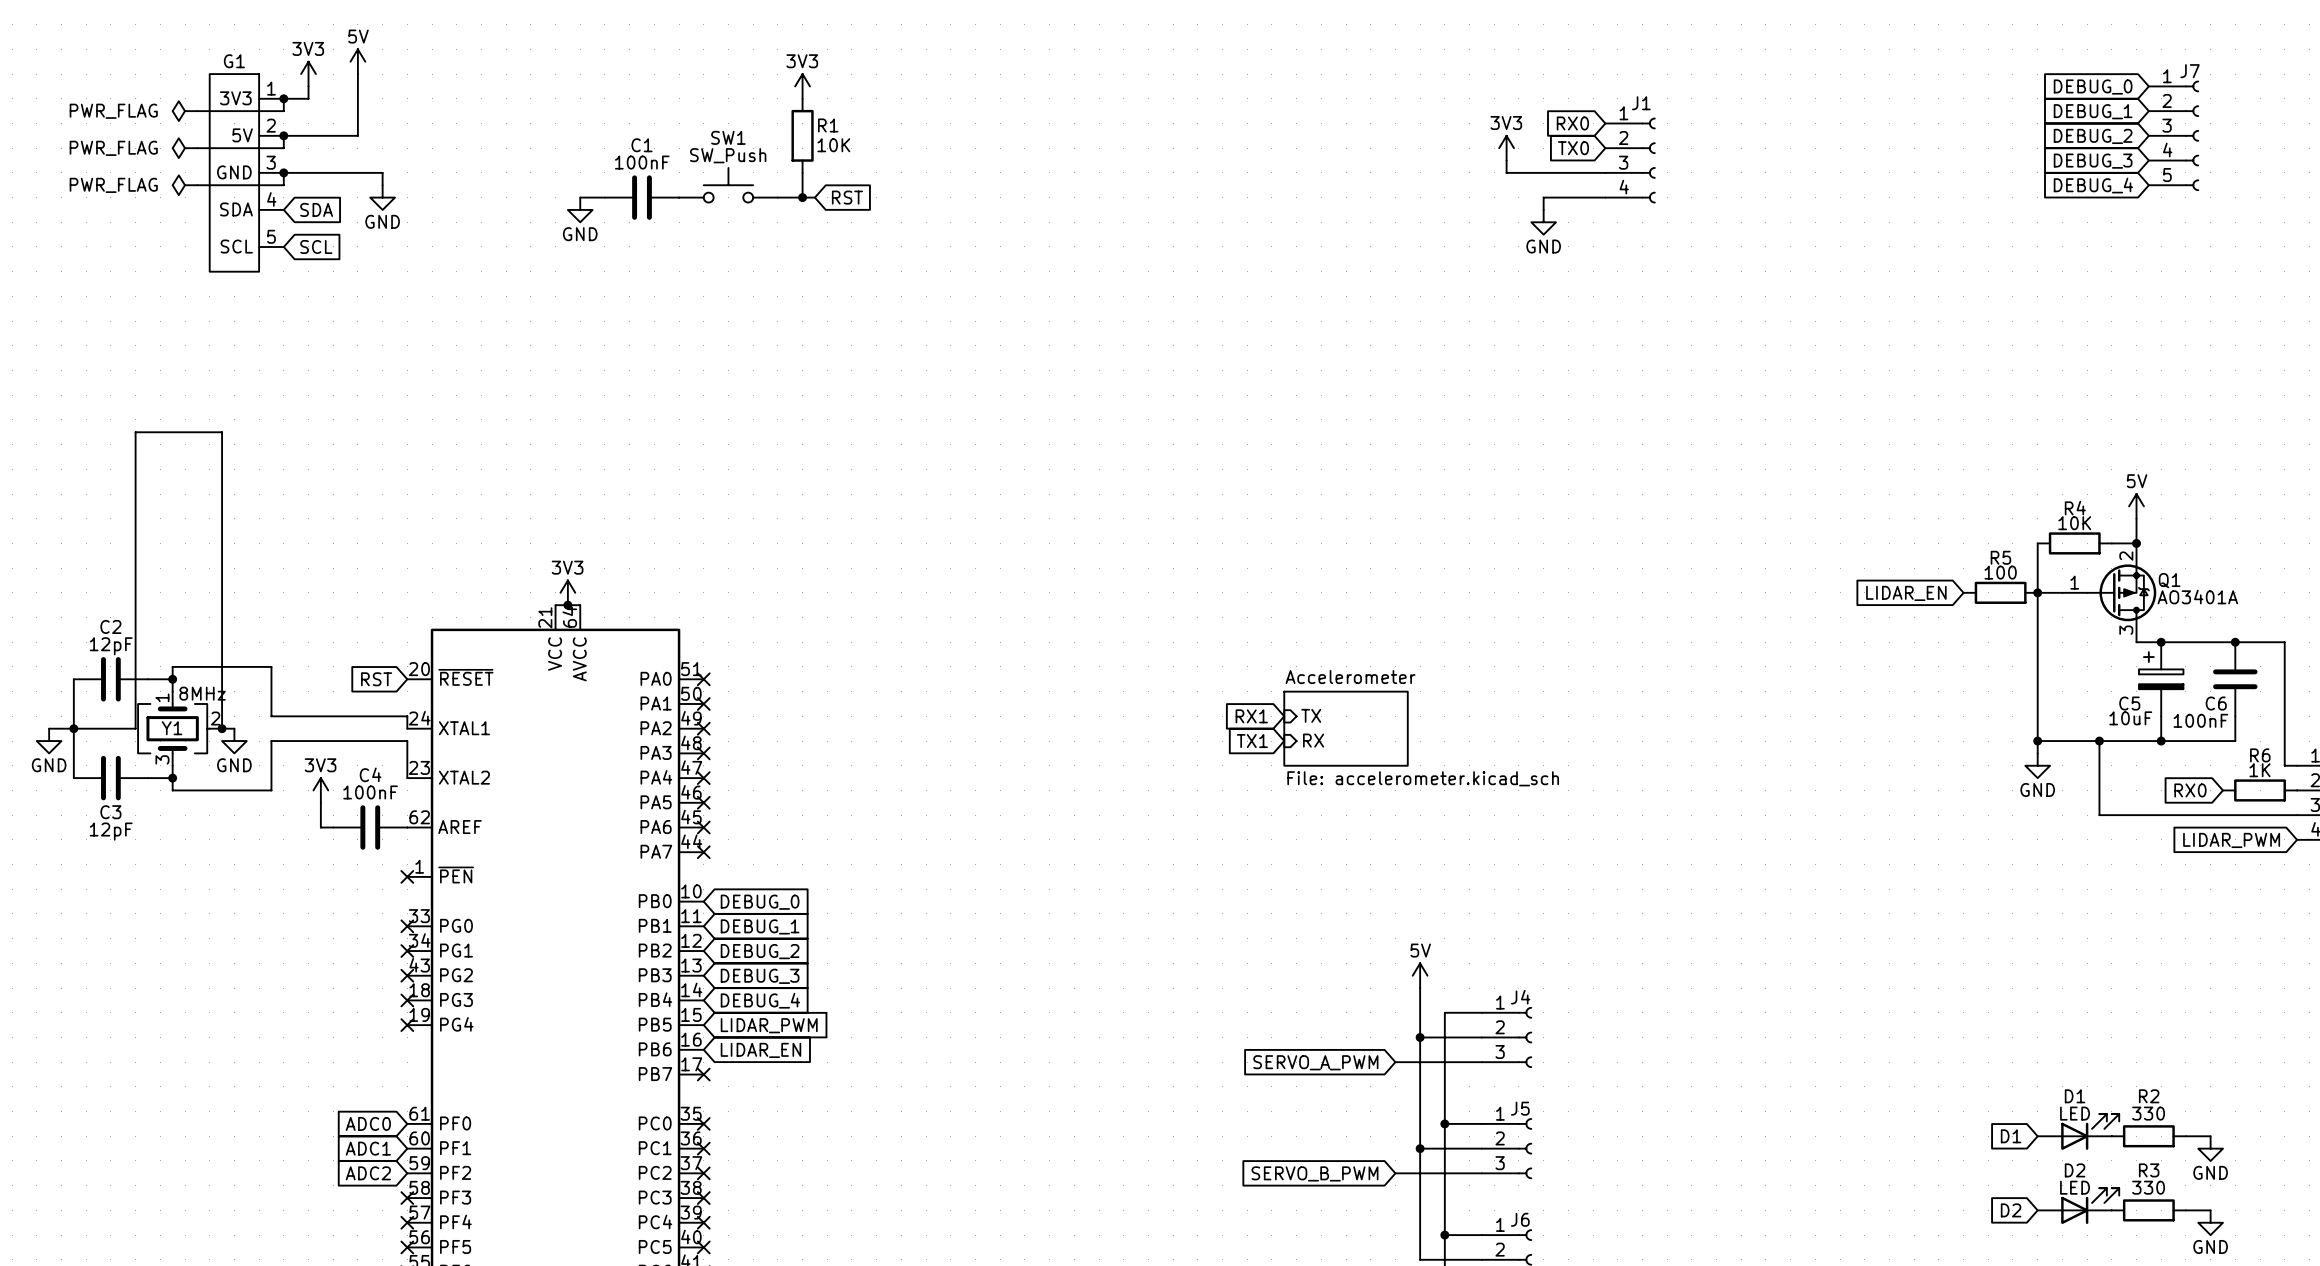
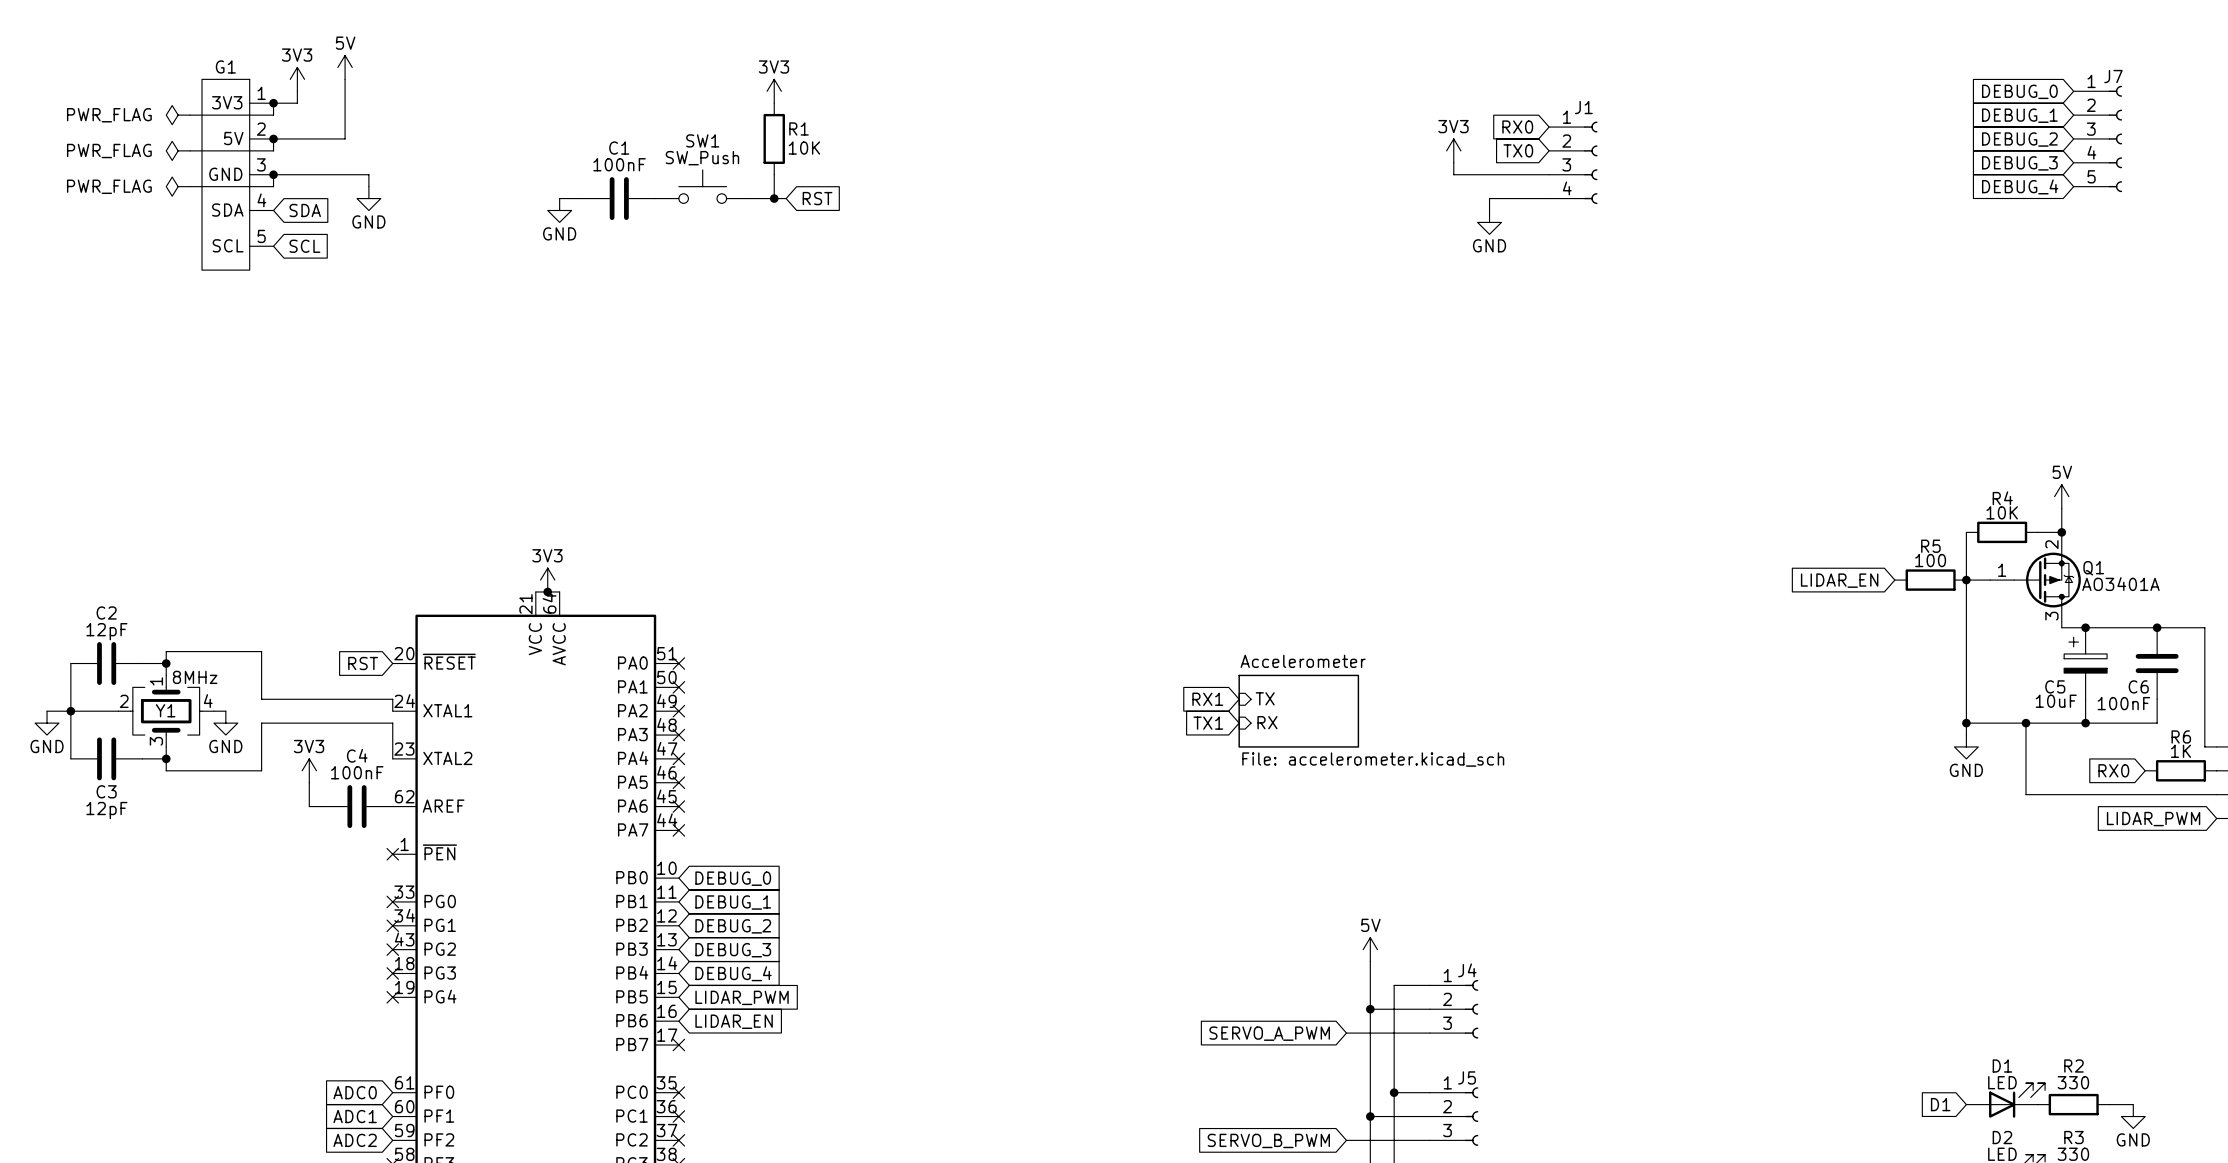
Y1 symbol: [138, 691, 223, 766] -> [118, 675, 214, 747]
wire: (123, 728) (135, 728) (135, 432) (222, 432) (222, 728) -> none
junction: (222, 728) -> none

